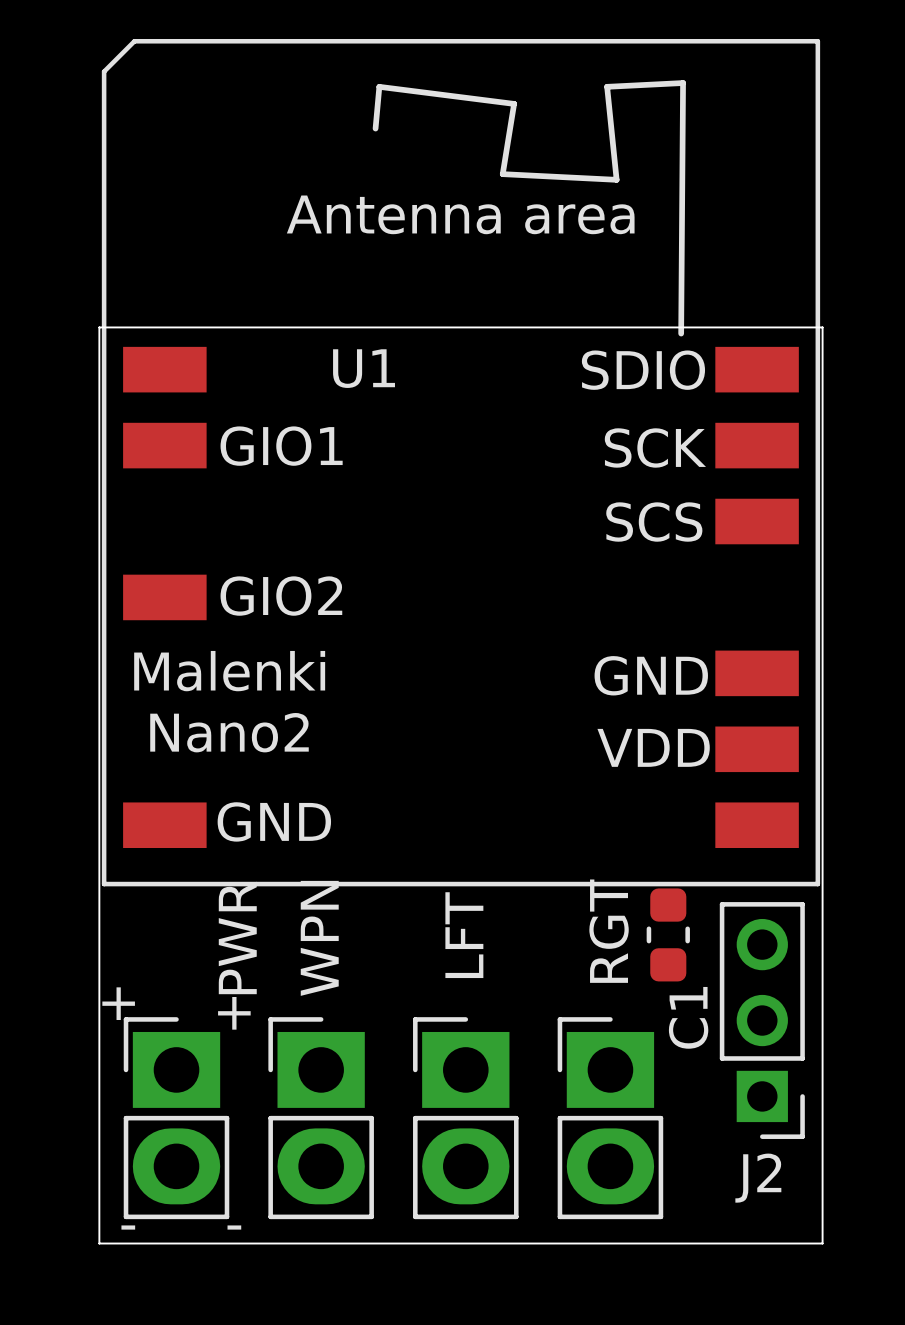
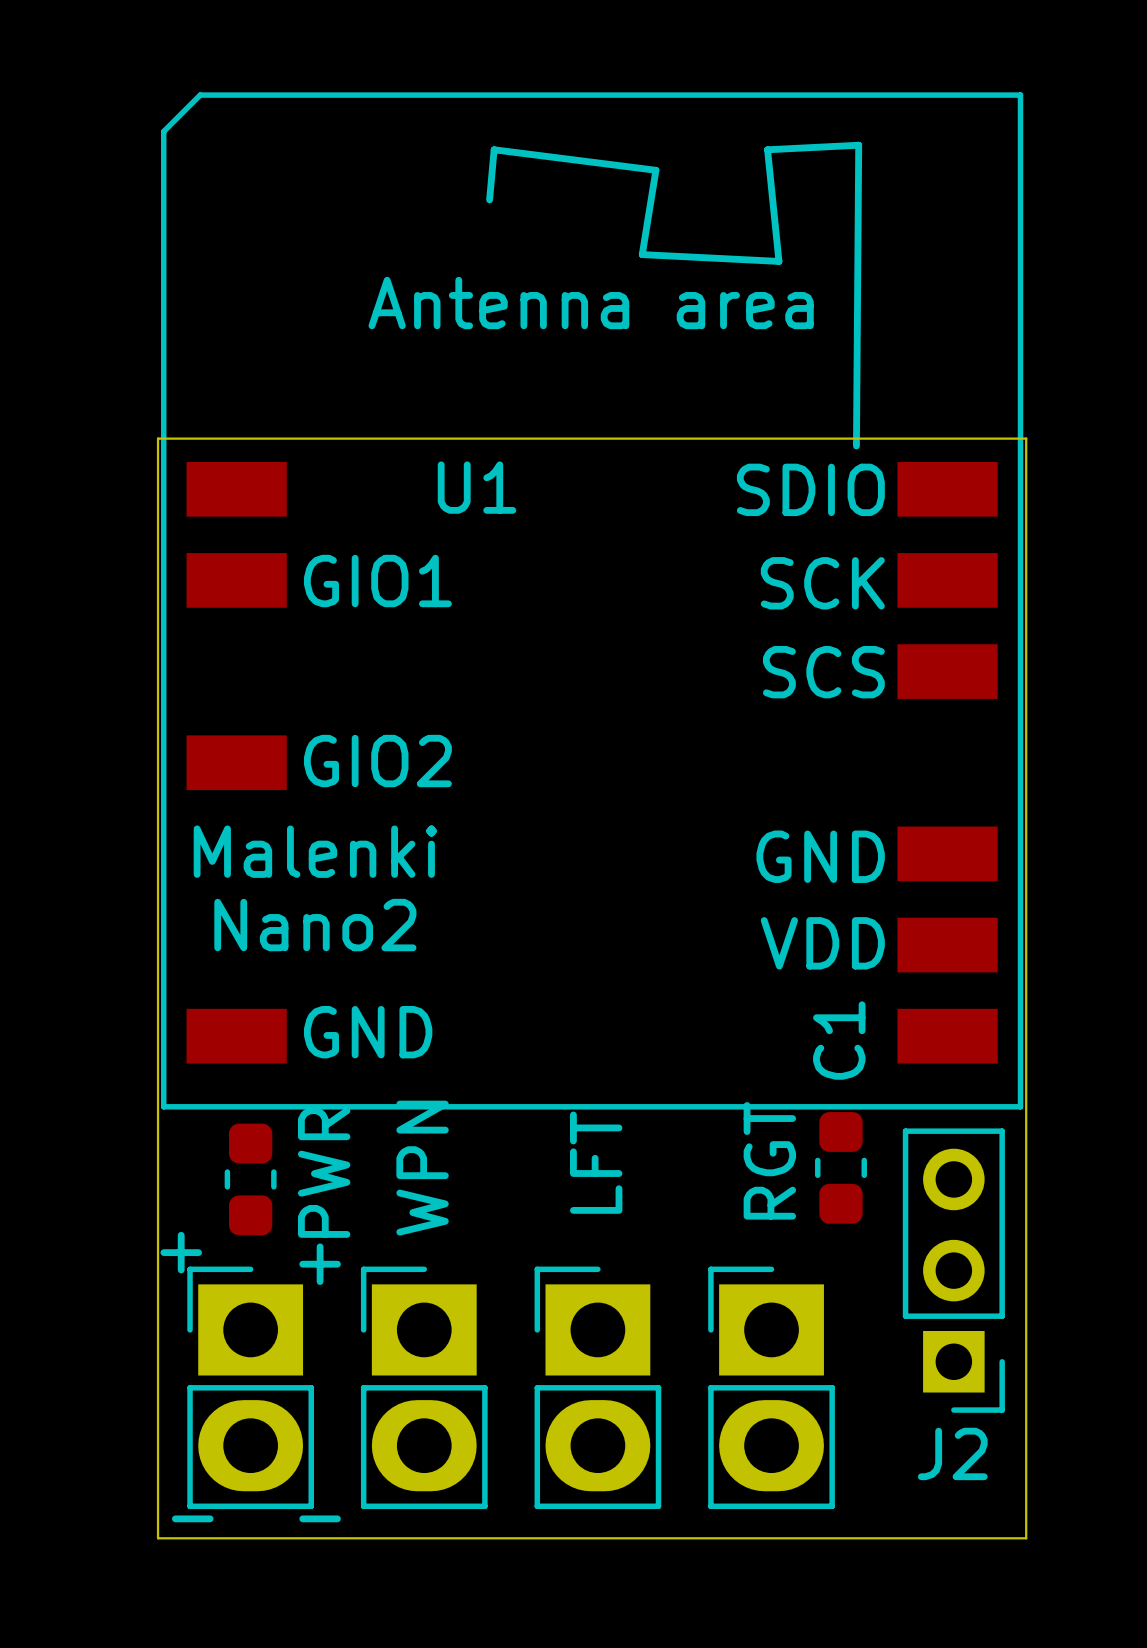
part: none -> (250, 1179)
C1 name position: C1 (688, 1017) -> C1 (839, 1040)

